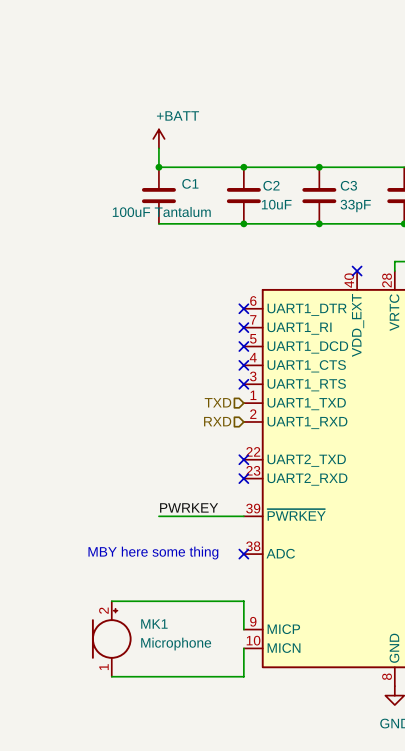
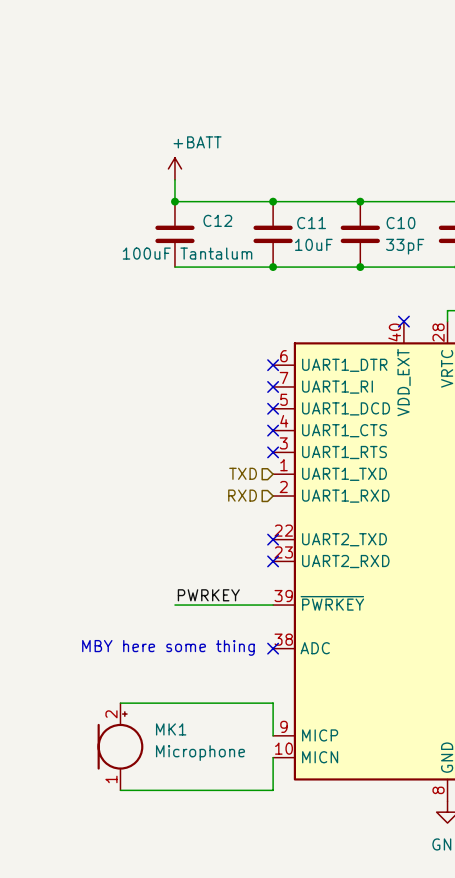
C1 name: C1 (190, 183) -> C12 (217, 220)
C2 name: C2 (271, 185) -> C11 (311, 223)
C3 name: C3 (348, 185) -> C10 (400, 223)

